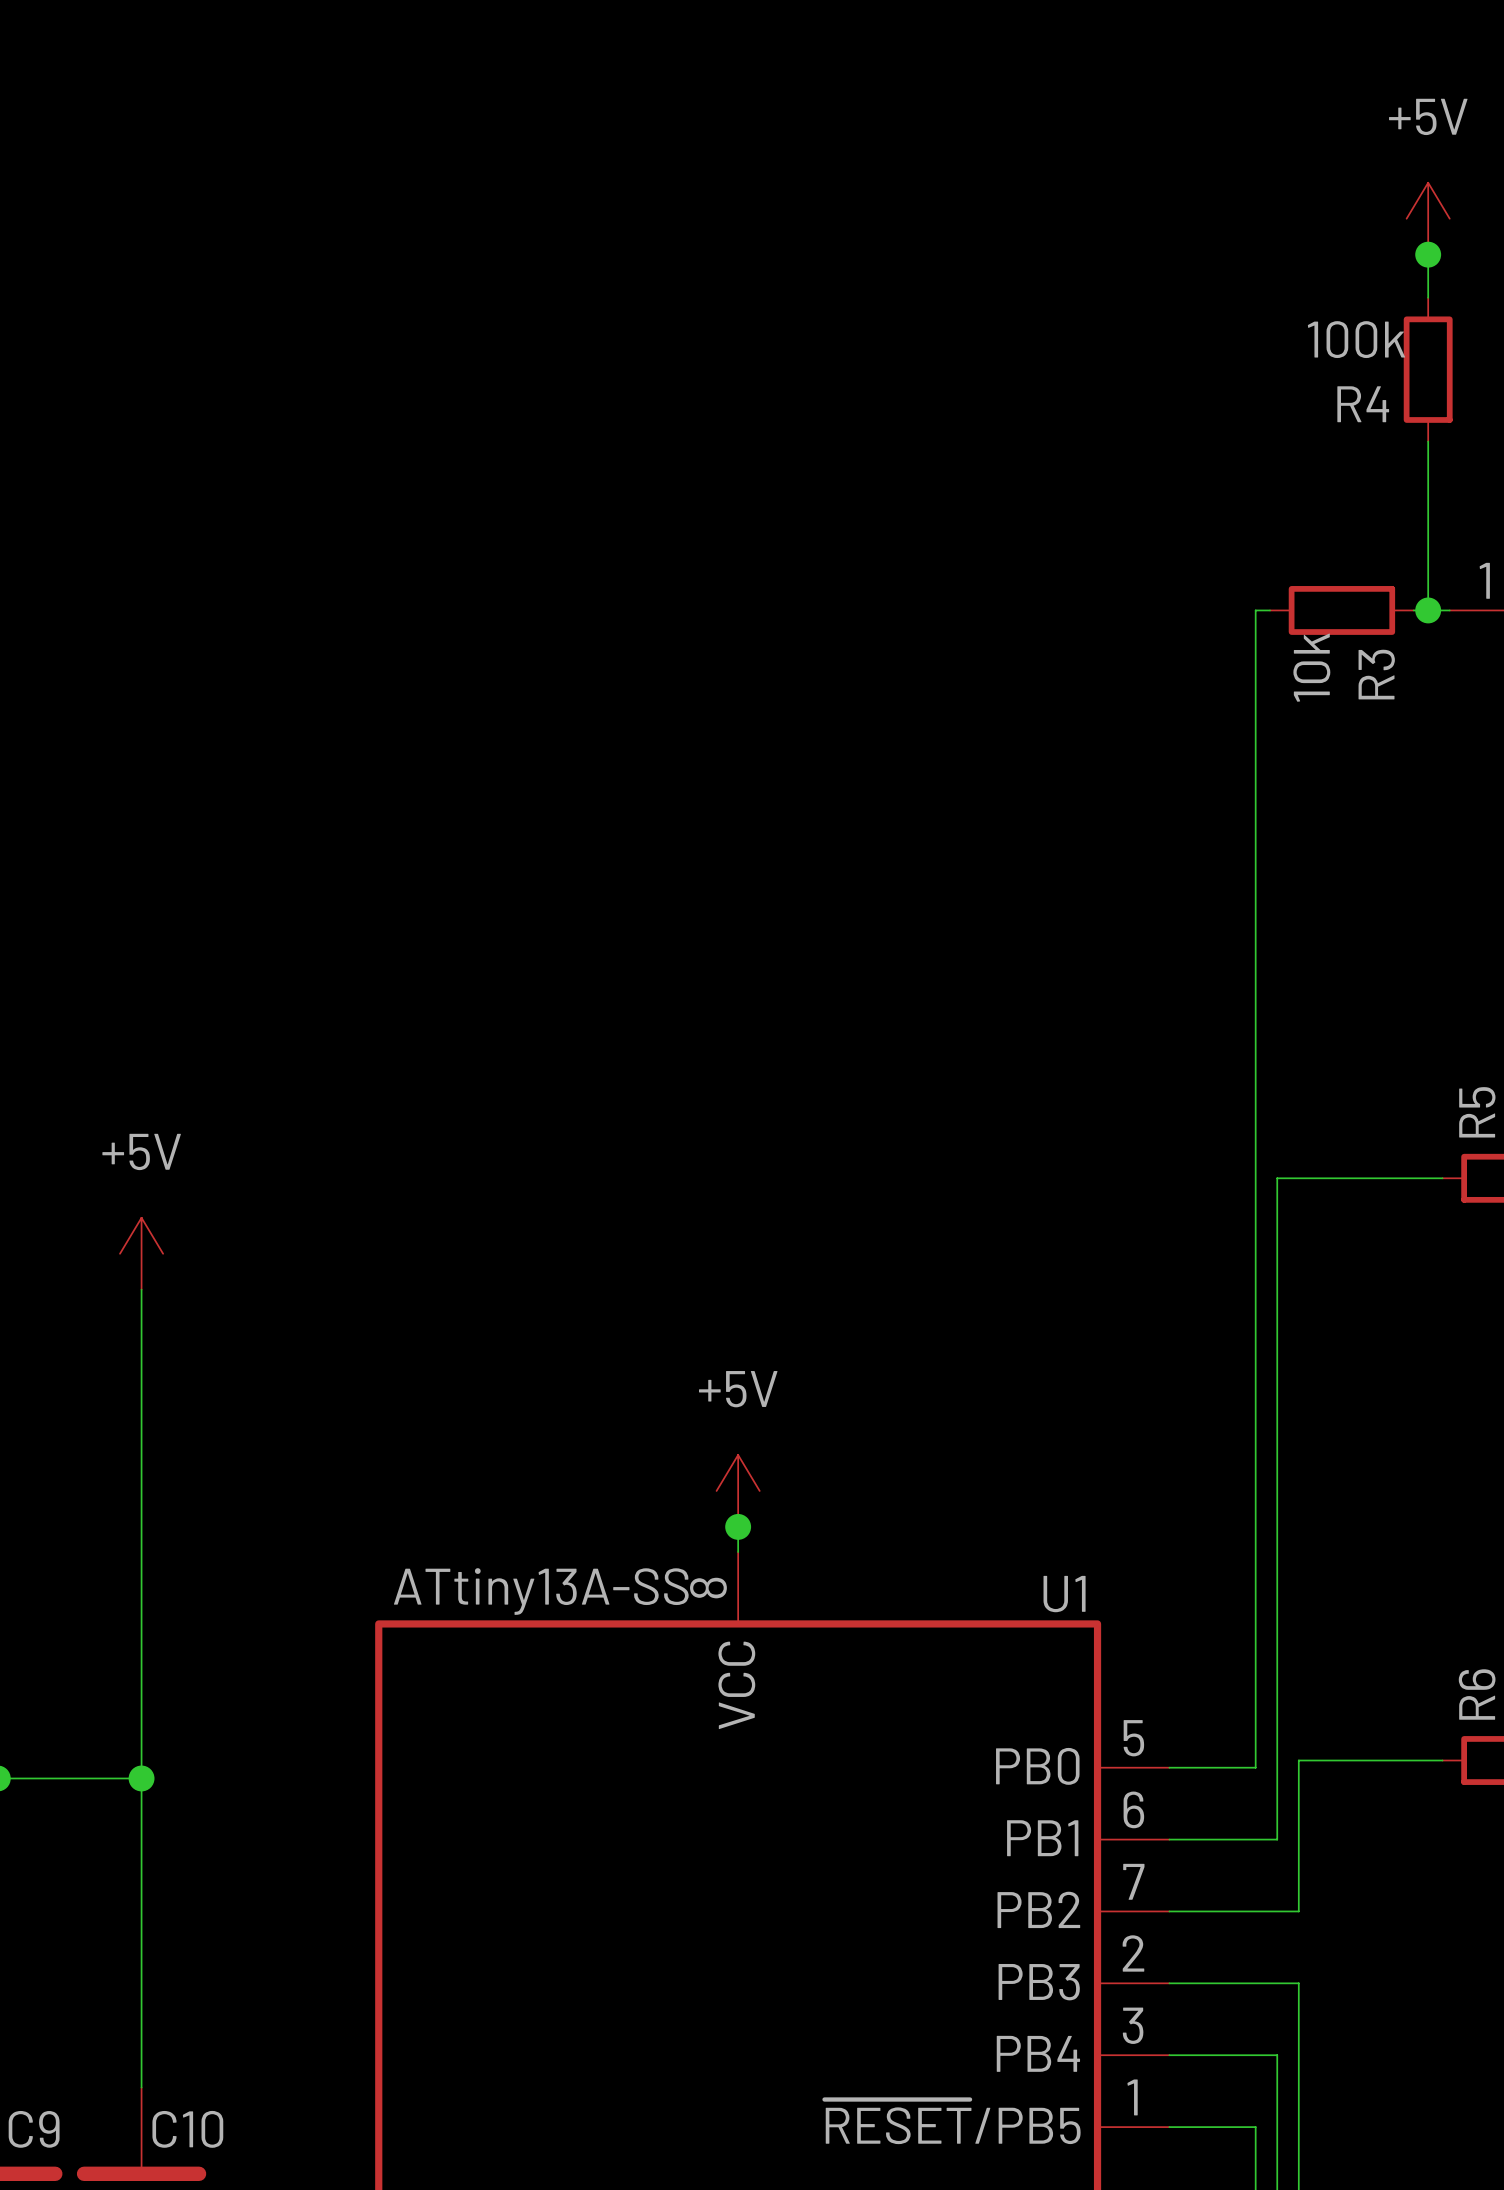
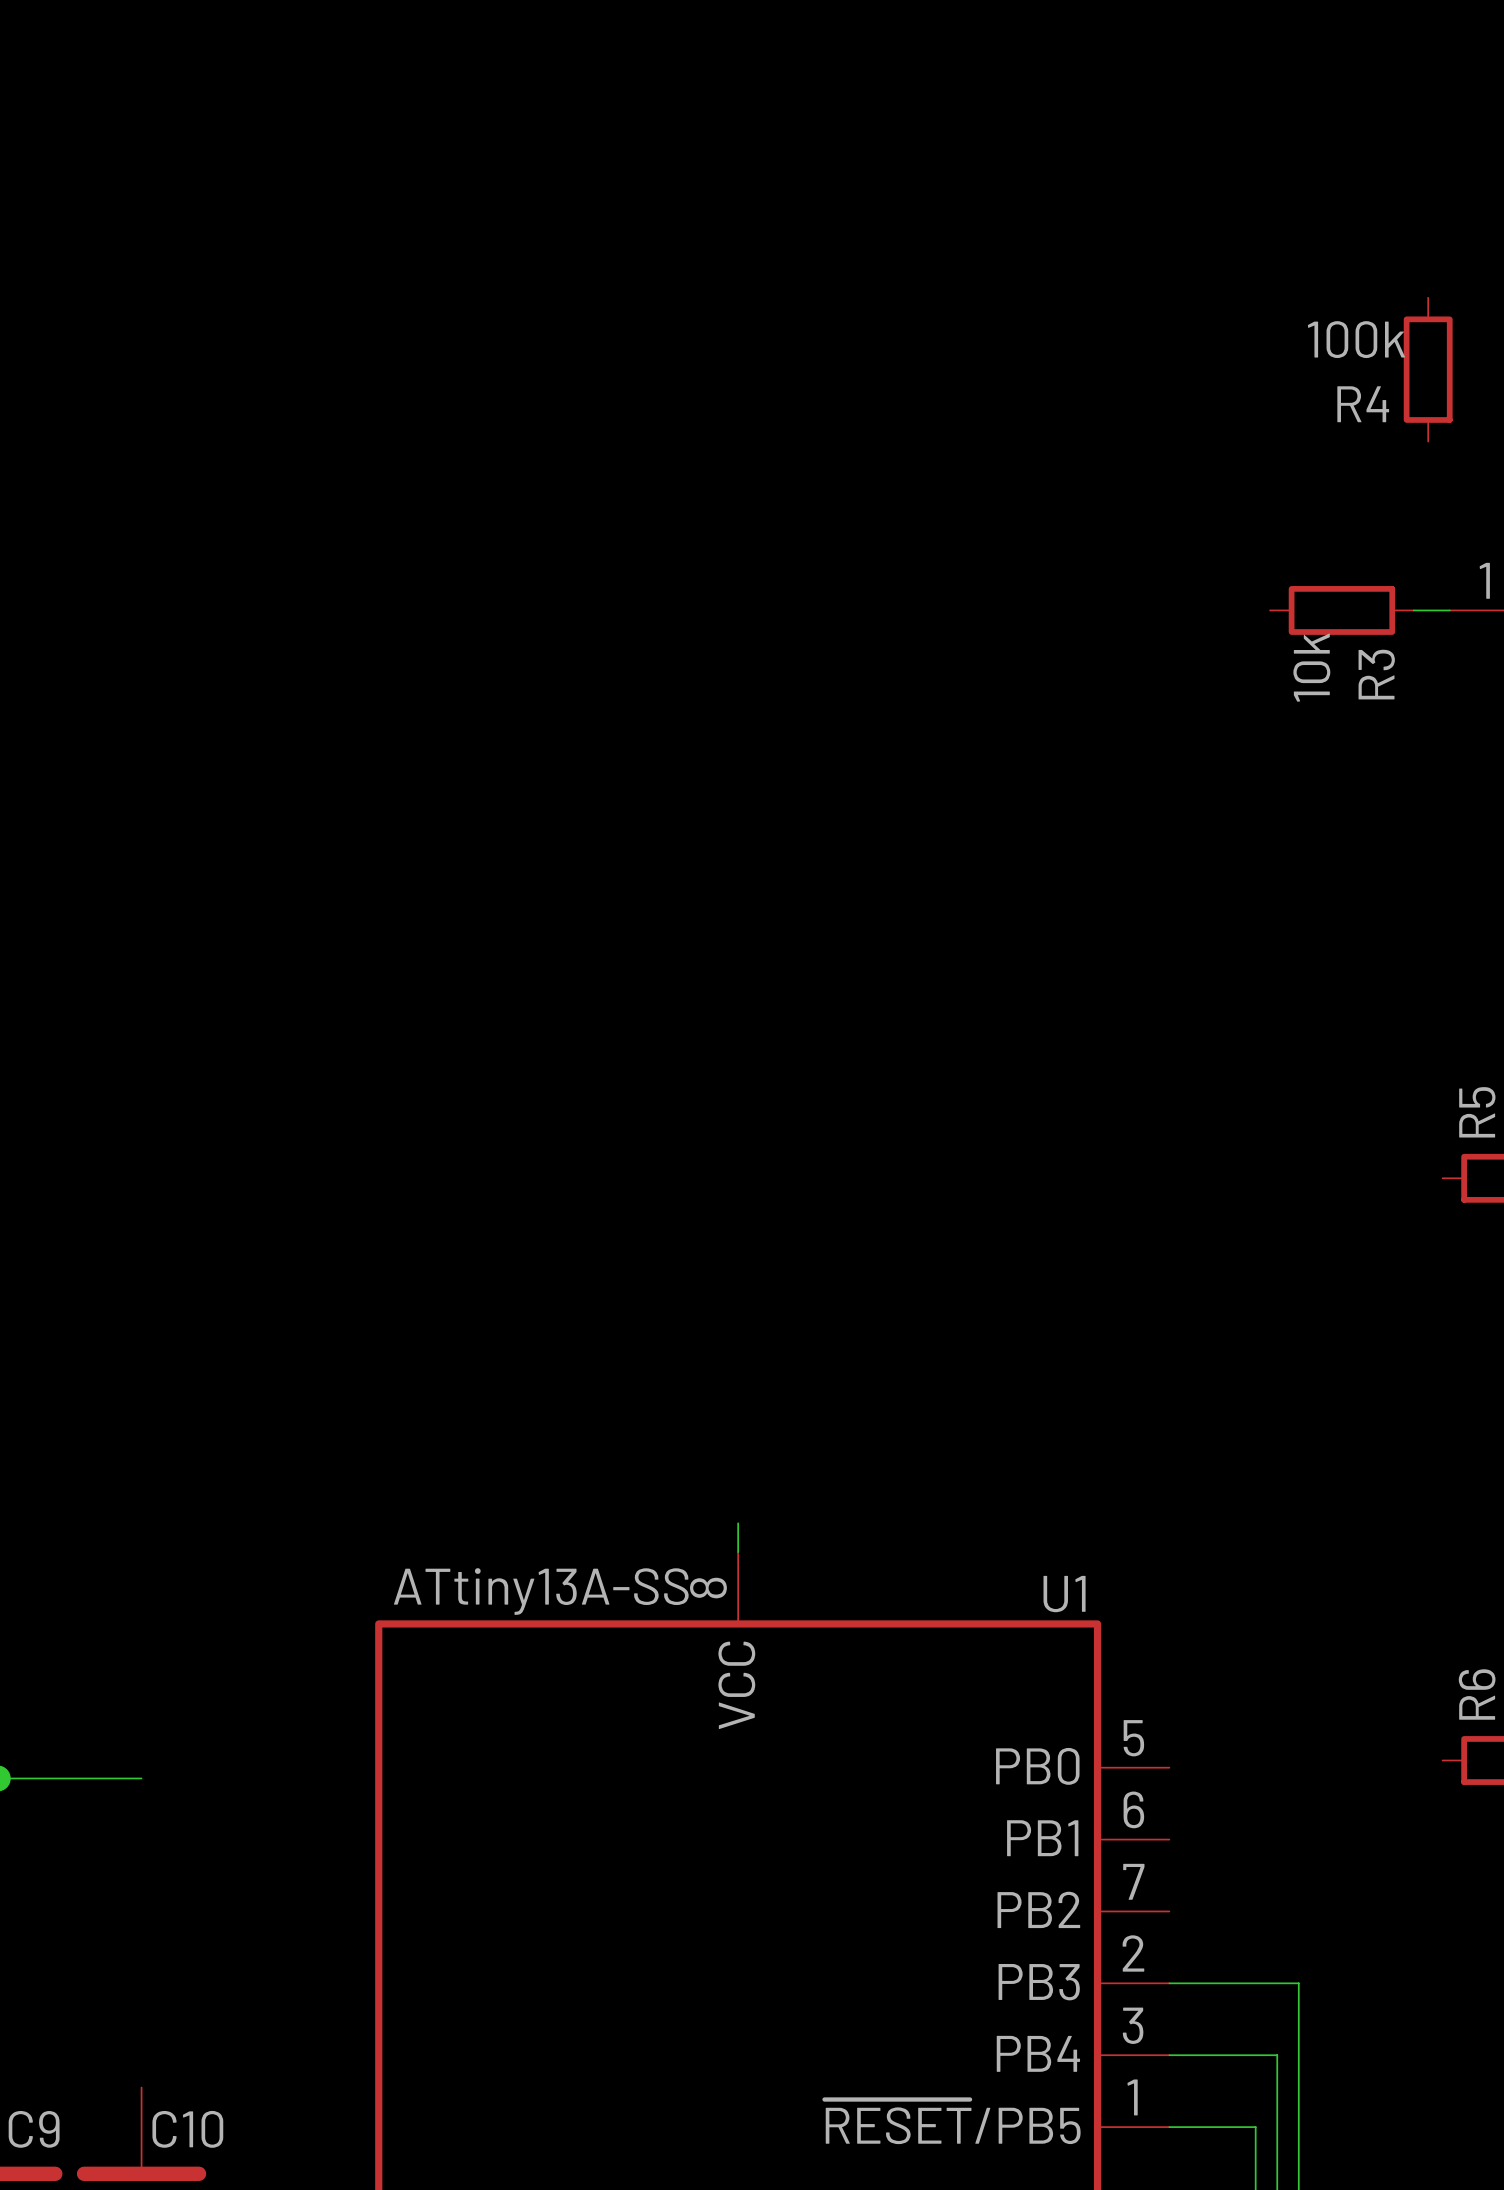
power symbol: +5V (1428, 218) -> none
wire: (1428, 251) (1428, 297) -> none
junction: (1428, 254) -> none
wire: (1428, 441) (1428, 610) -> none
wire: (1270, 610) (1255, 610) (1255, 1767) (1169, 1767) -> none
junction: (1428, 610) -> none
wire: (1442, 1178) (1277, 1178) (1277, 1839) (1169, 1839) -> none
power symbol: +5V (141, 1253) -> none
wire: (141, 1289) (141, 2087) -> none
power symbol: +5V (738, 1490) -> none
junction: (738, 1526) -> none
wire: (1442, 1760) (1298, 1760) (1298, 1911) (1169, 1911) -> none
junction: (141, 1778) -> none

